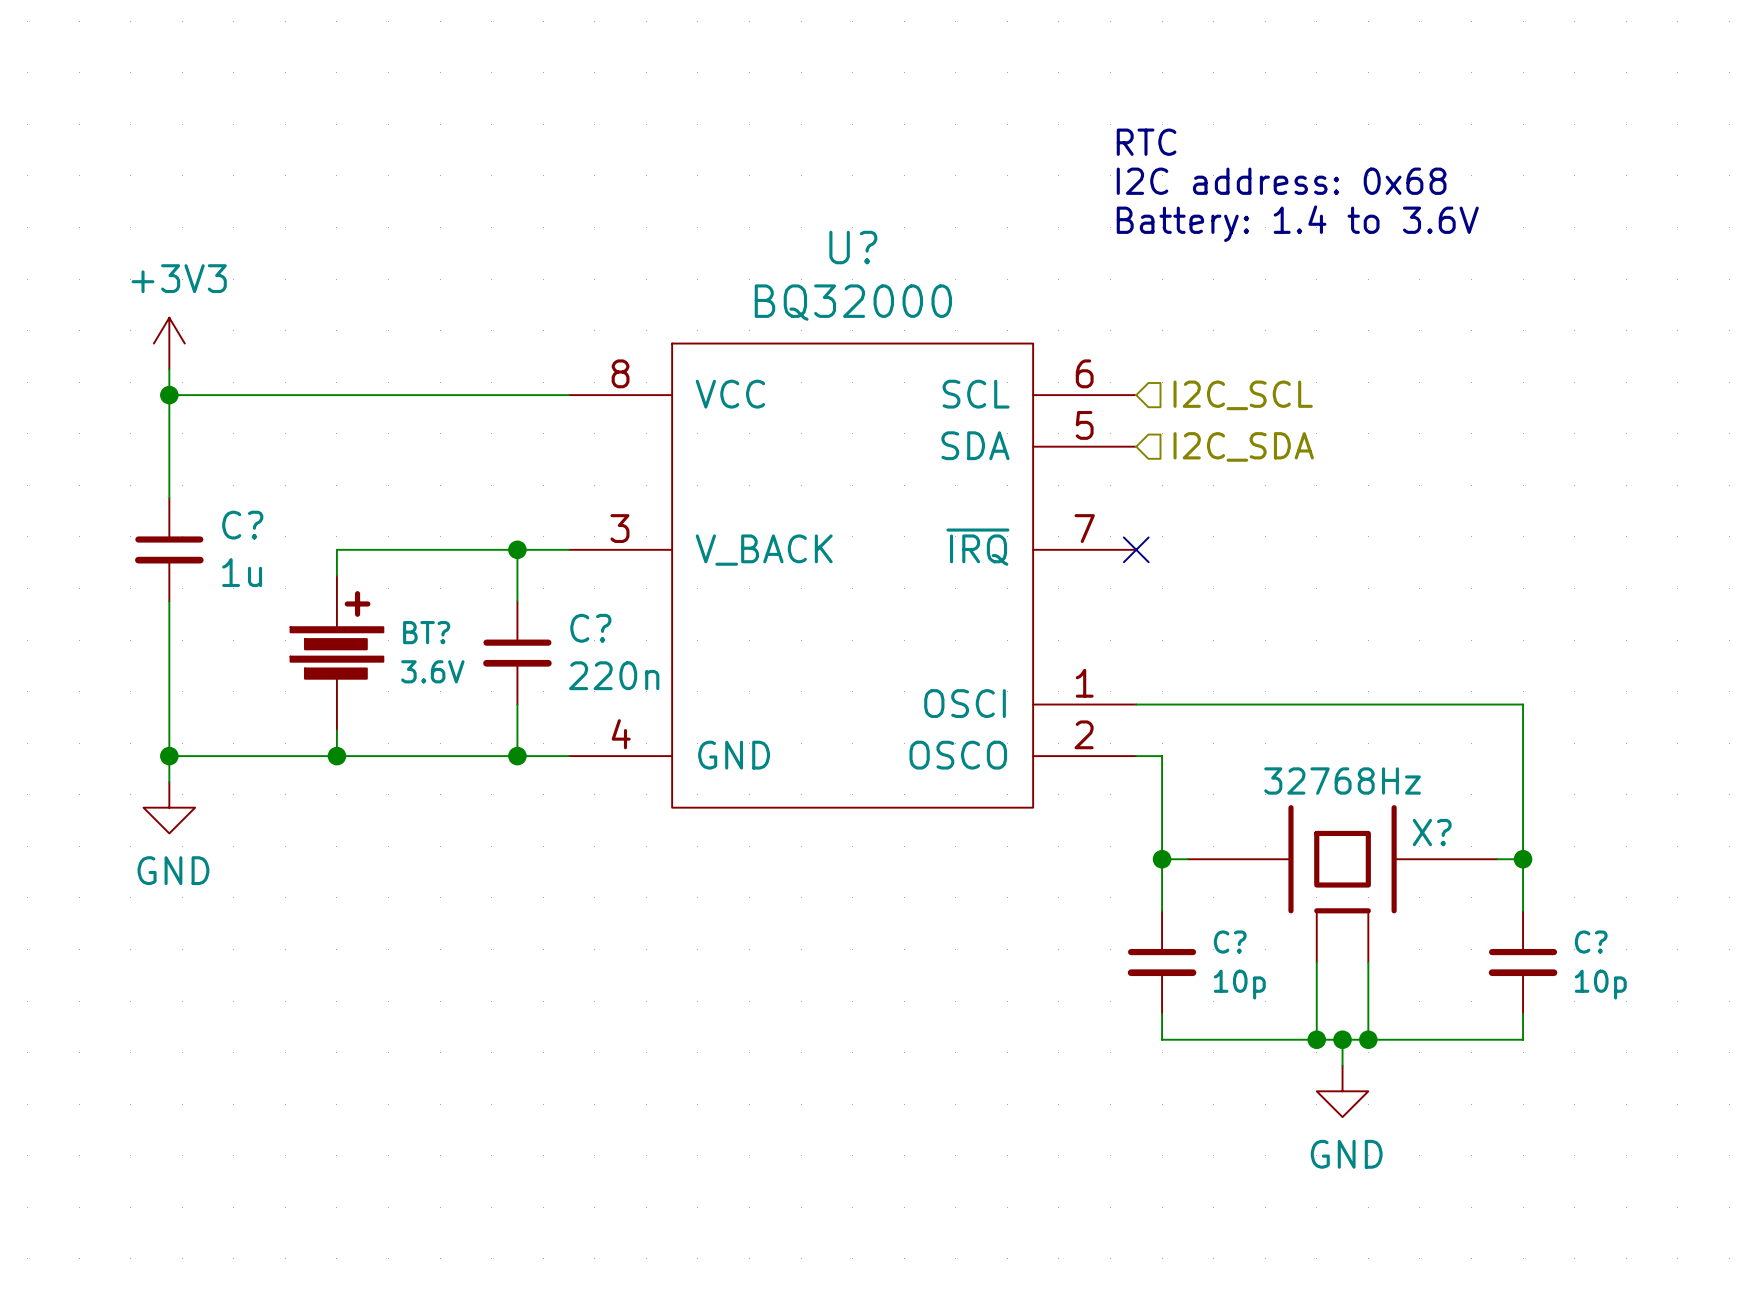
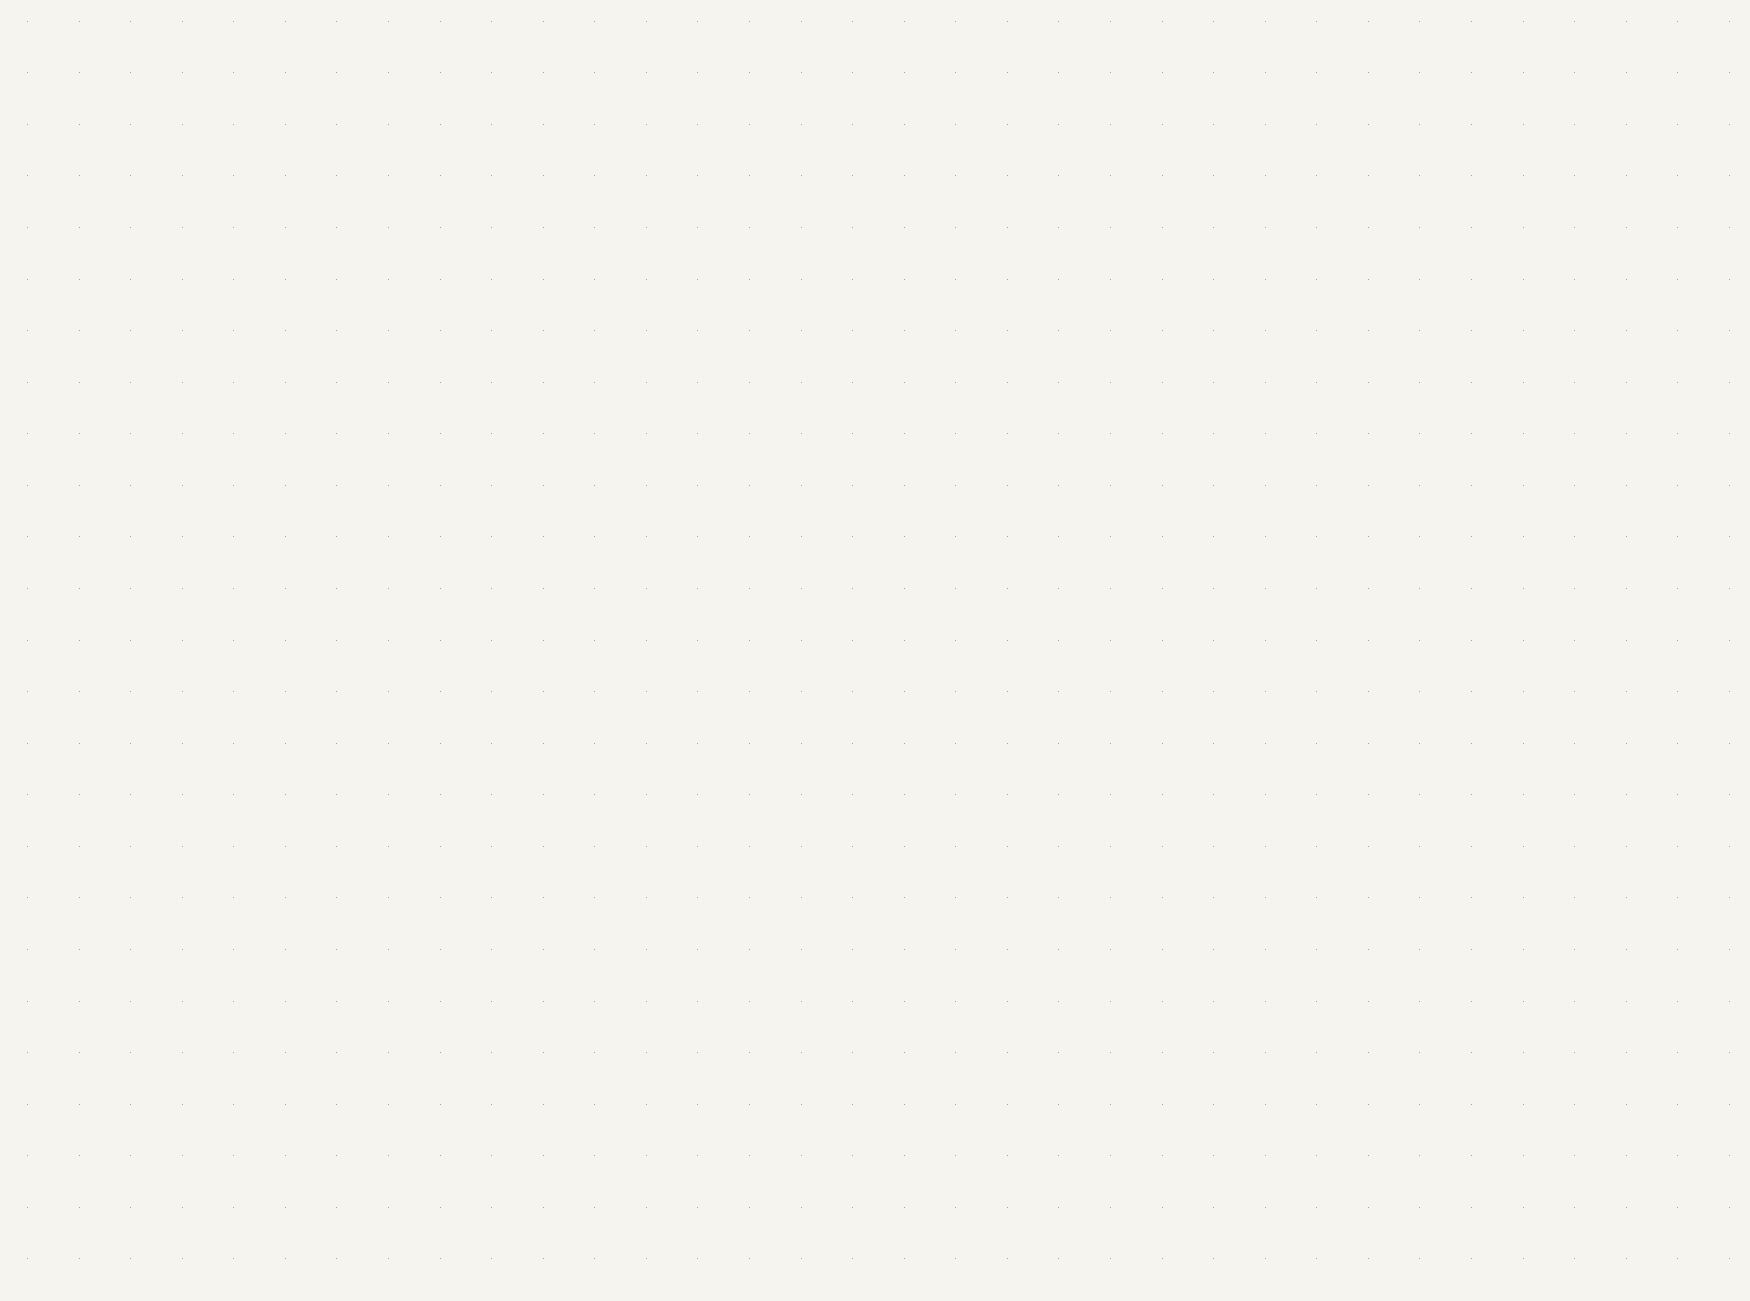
text: RTC (1146, 142) -> none
text: I2C address: 0x68 (1281, 181) -> none
text: Battery: 1.4 to 3.6V (1297, 223) -> none
power symbol: +3V3 (169, 343) -> none
wire: (169, 369) (169, 498) -> none
wire: (169, 395) (569, 395) -> none
junction: (169, 395) -> none
hierarchical label: I2C_SCL (1243, 395) -> none
hierarchical label: I2C_SDA (1243, 446) -> none
C?: 1u (169, 549) -> none
wire: (517, 549) (517, 601) -> none
junction: (517, 549) -> none
wire: (569, 549) (336, 549) (336, 575) -> none
no-connect mark: (1136, 549) -> none
U?: BQ32000 (852, 575) -> none
wire: (169, 601) (169, 781) -> none
BT?: 3.6V (336, 652) -> none
C?: 220n (517, 652) -> none
wire: (517, 704) (517, 756) -> none
wire: (1136, 704) (1523, 704) (1523, 910) -> none
wire: (336, 730) (336, 756) -> none
wire: (169, 756) (569, 756) -> none
junction: (169, 756) -> none
junction: (336, 756) -> none
junction: (517, 756) -> none
wire: (1136, 756) (1162, 756) (1162, 910) -> none
power symbol: GND (169, 807) -> none
wire: (1162, 859) (1187, 859) -> none
junction: (1162, 859) -> none
wire: (1497, 859) (1523, 859) -> none
junction: (1523, 859) -> none
X?: 32768Hz (1342, 883) -> none
C?: 10p (1162, 962) -> none
wire: (1316, 962) (1316, 1039) -> none
wire: (1368, 962) (1368, 1039) -> none
C?: 10p (1523, 962) -> none
wire: (1162, 1013) (1162, 1039) (1523, 1039) (1523, 1013) -> none
junction: (1316, 1039) -> none
wire: (1342, 1039) (1342, 1065) -> none
junction: (1342, 1039) -> none
junction: (1368, 1039) -> none
power symbol: GND (1342, 1091) -> none

